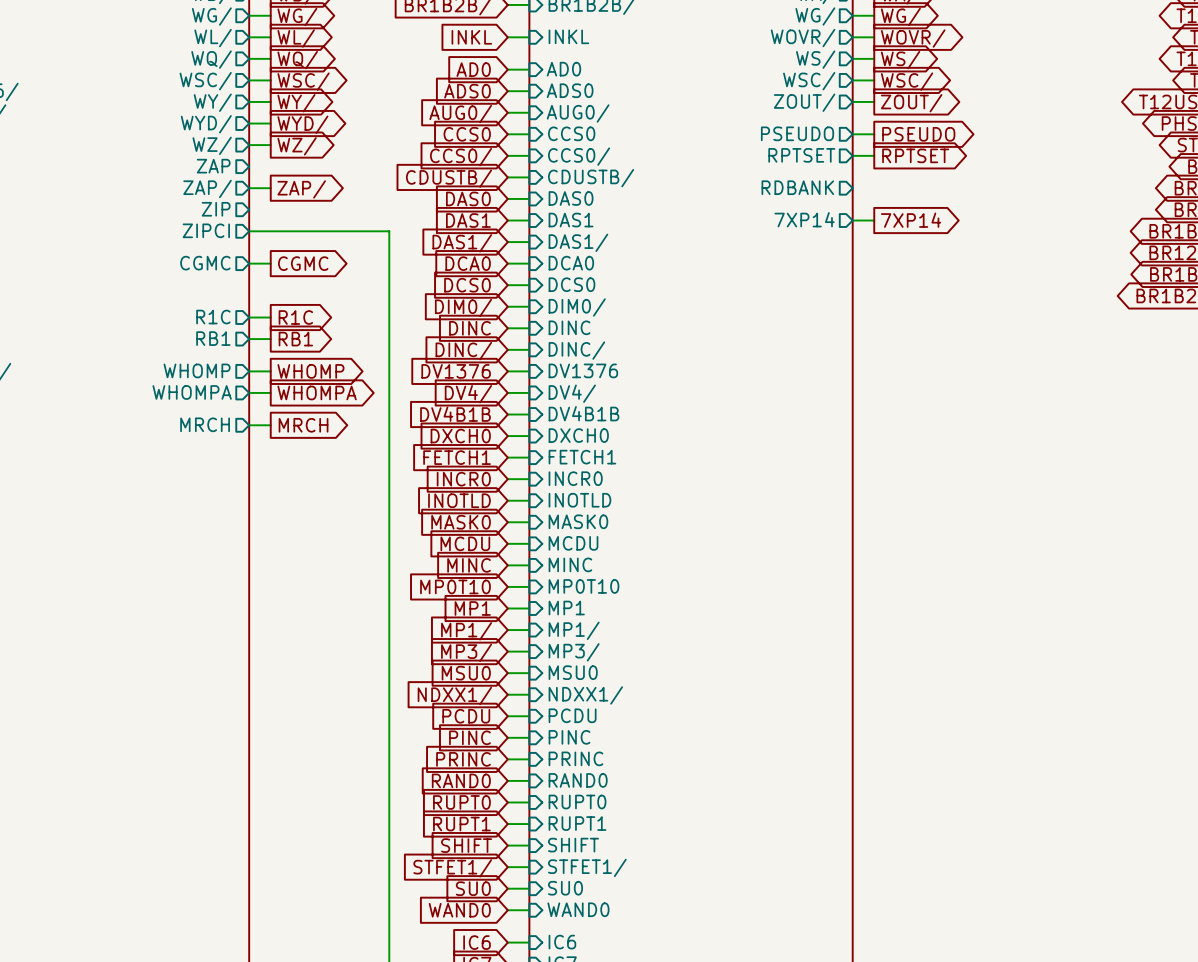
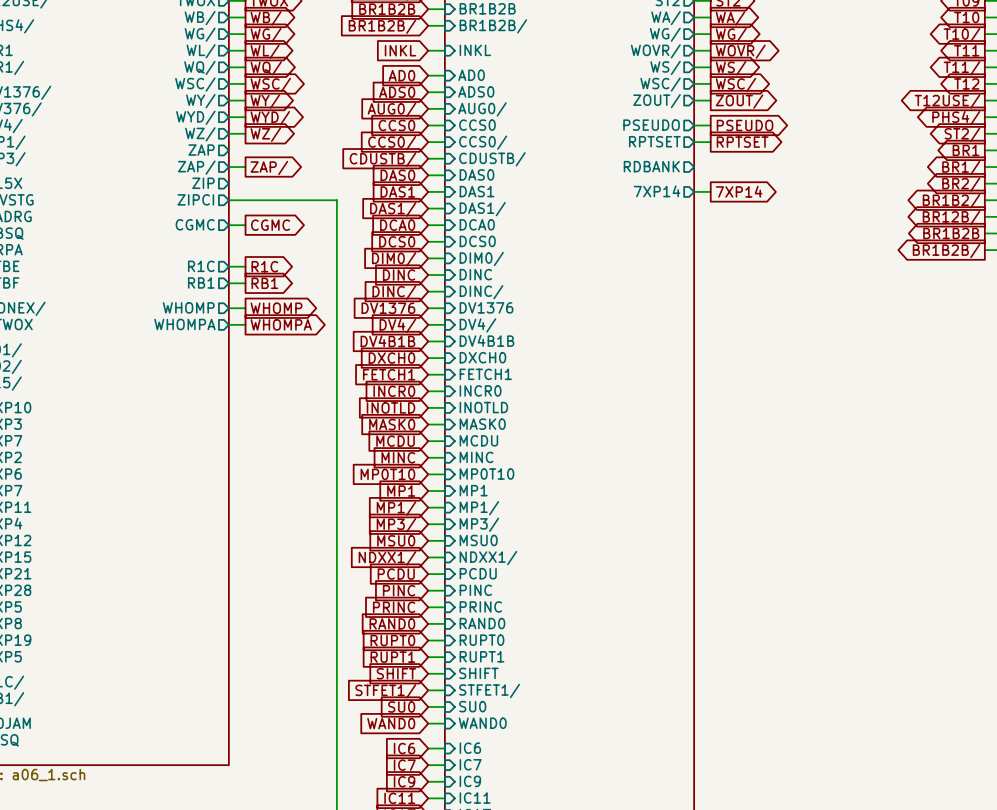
sheet pin: MRCH (205, 424) -> none
wire: (249, 425) (270, 425) -> none
global label: MRCH (303, 425) -> none

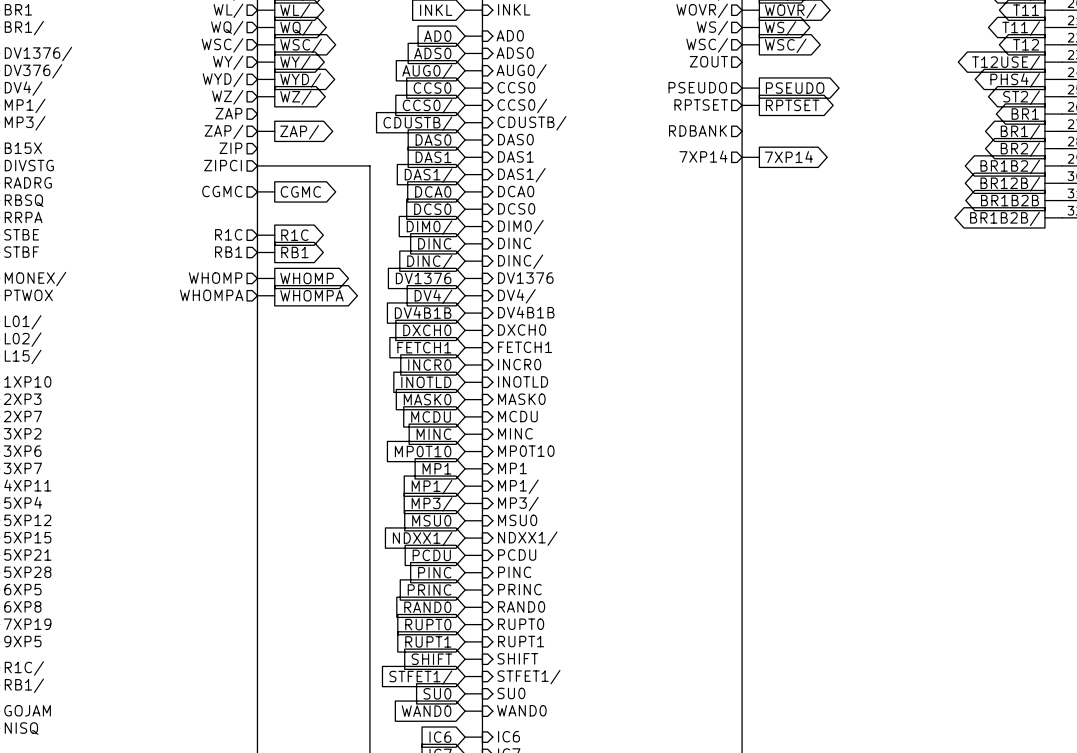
wire: (694, 100) (710, 100) -> none
sheet pin: ZOUT/ (657, 101) -> ZOUT (708, 61)
global label: ZOUT/ (739, 101) -> none

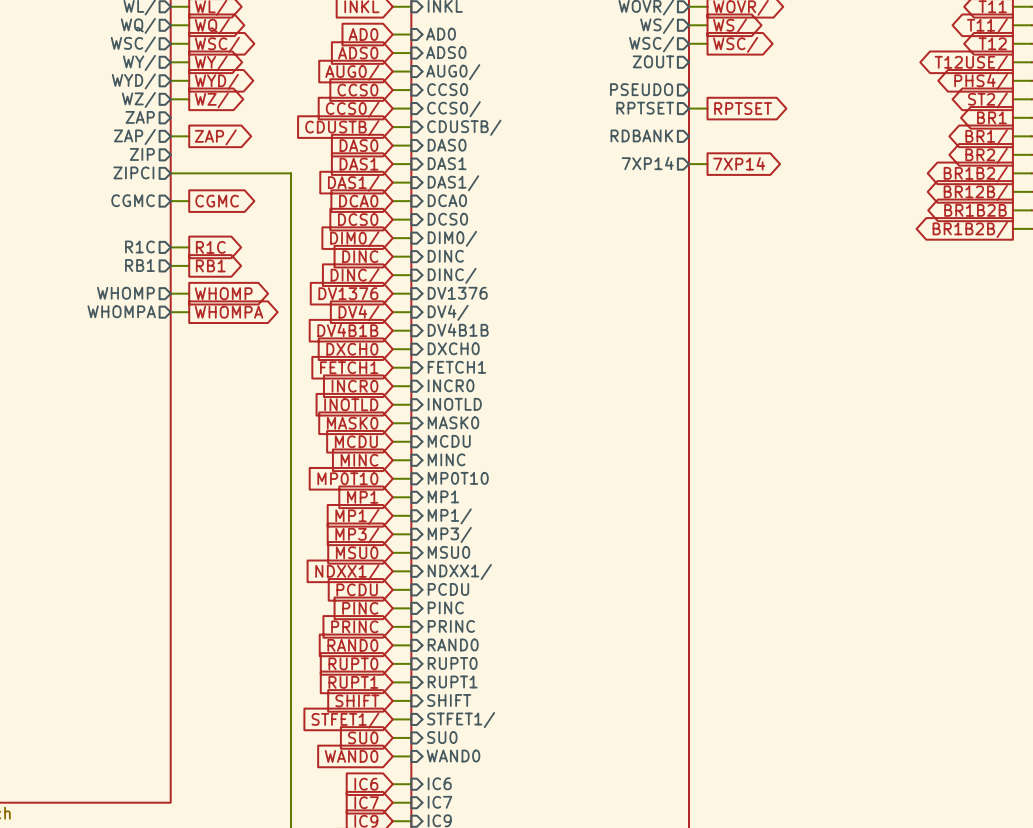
wire: (742, 88) (759, 88) -> none
global label: PSEUDO (795, 88) -> none

